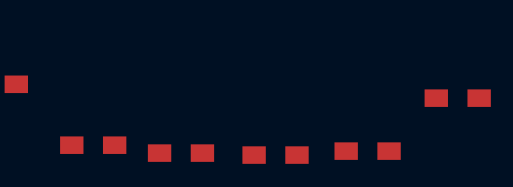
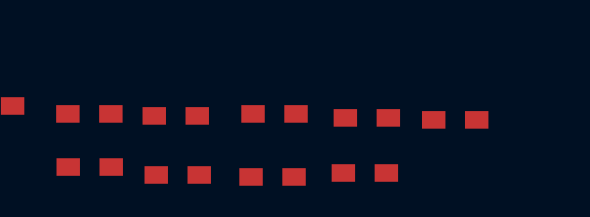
part: none -> (89, 113)
part: none -> (274, 113)
part: none -> (175, 115)
part: none -> (366, 117)

